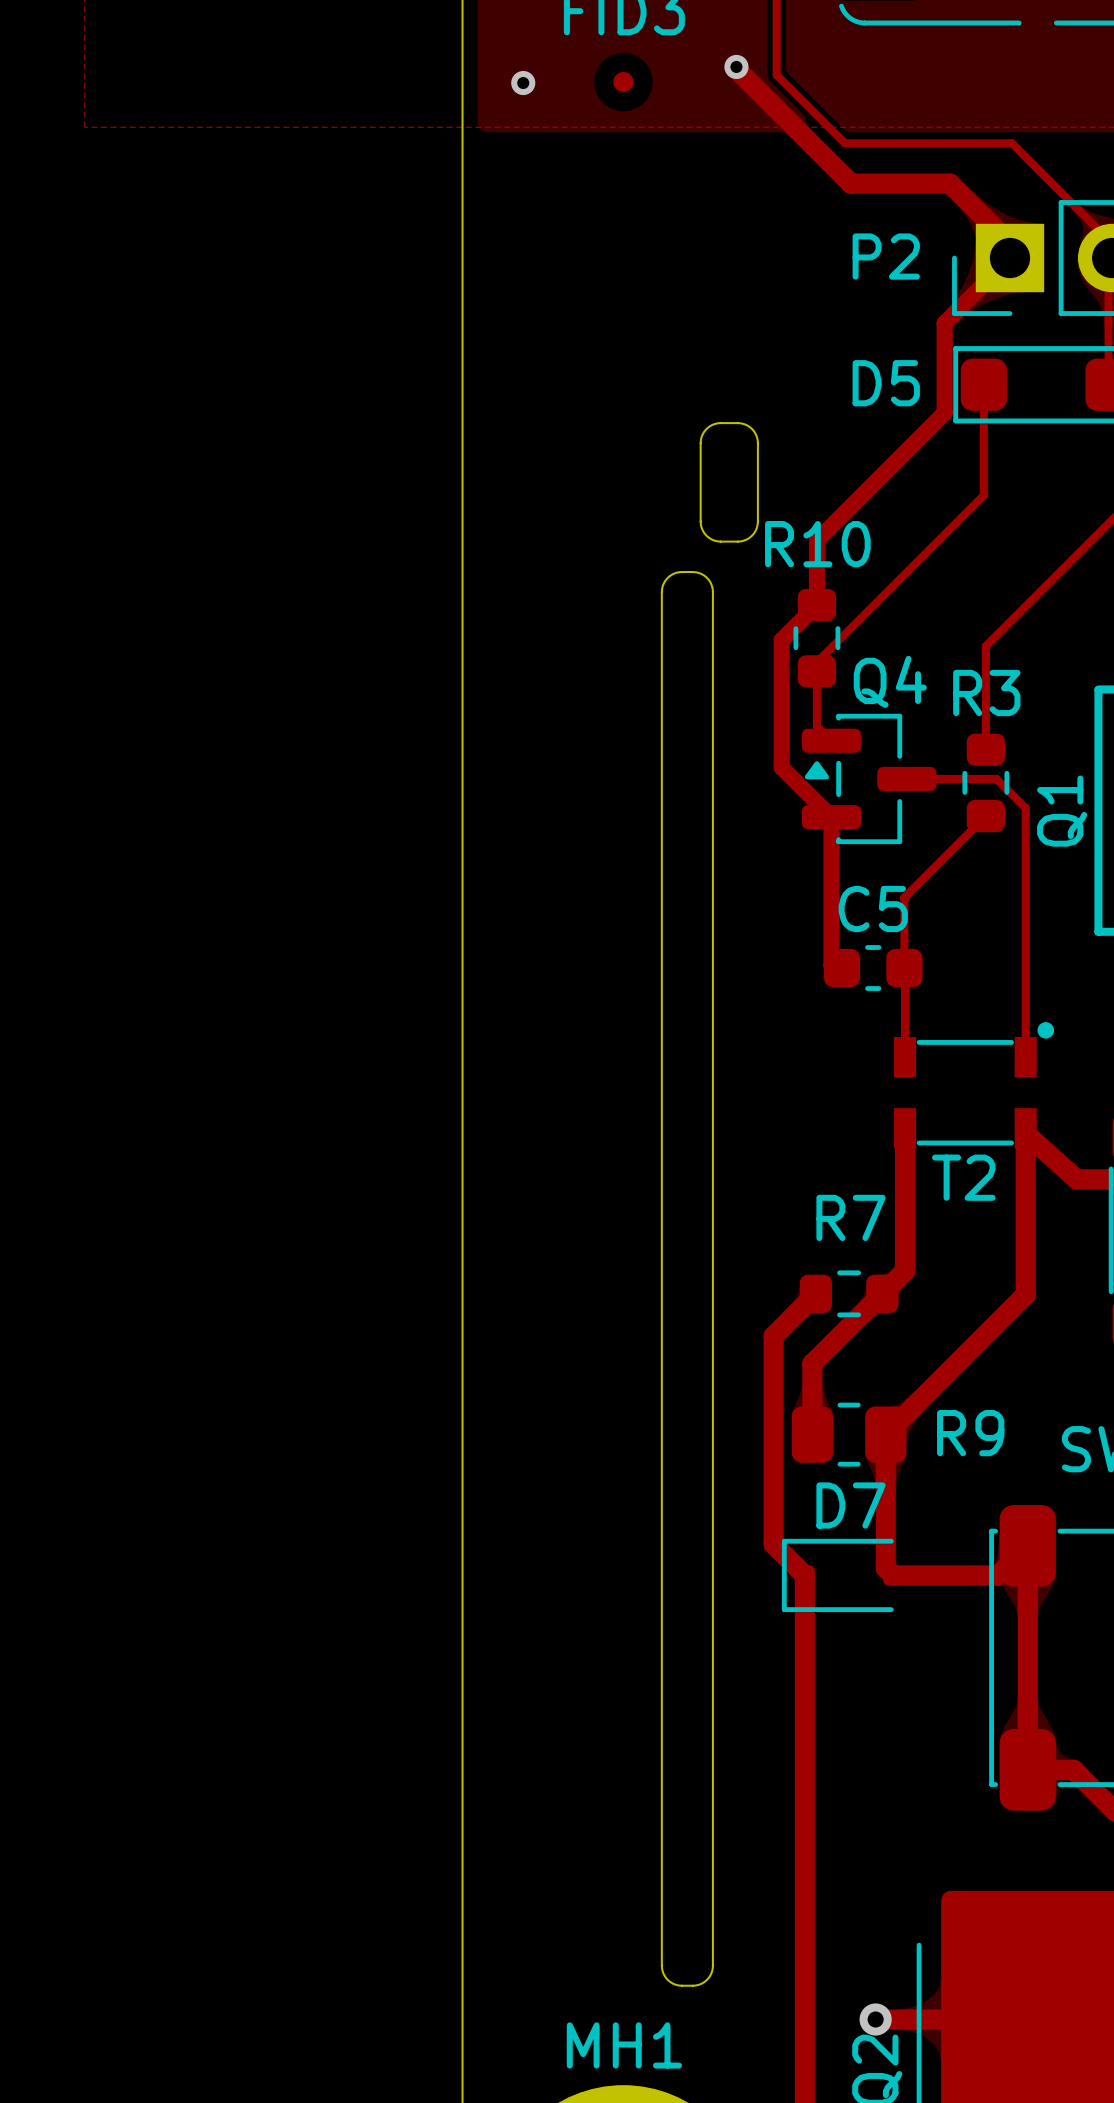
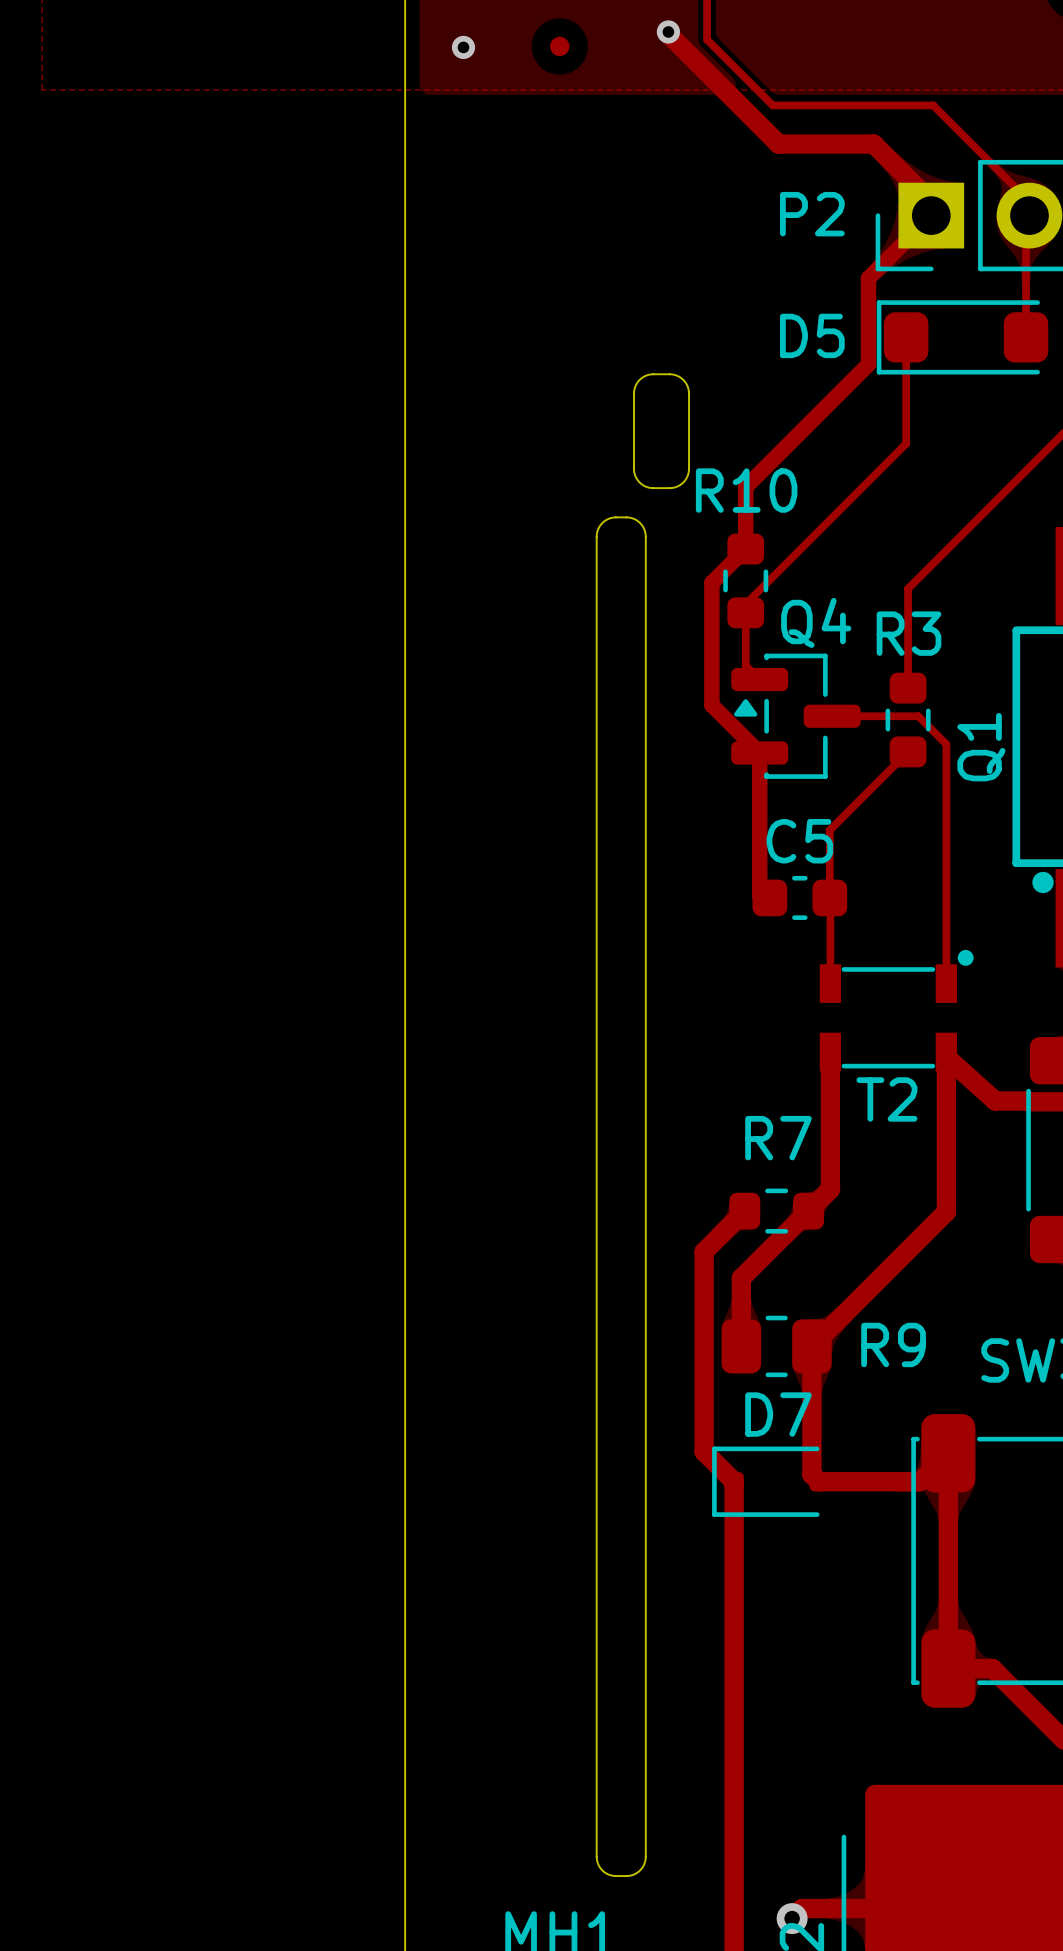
via position: (875, 2019) -> (792, 1918)

